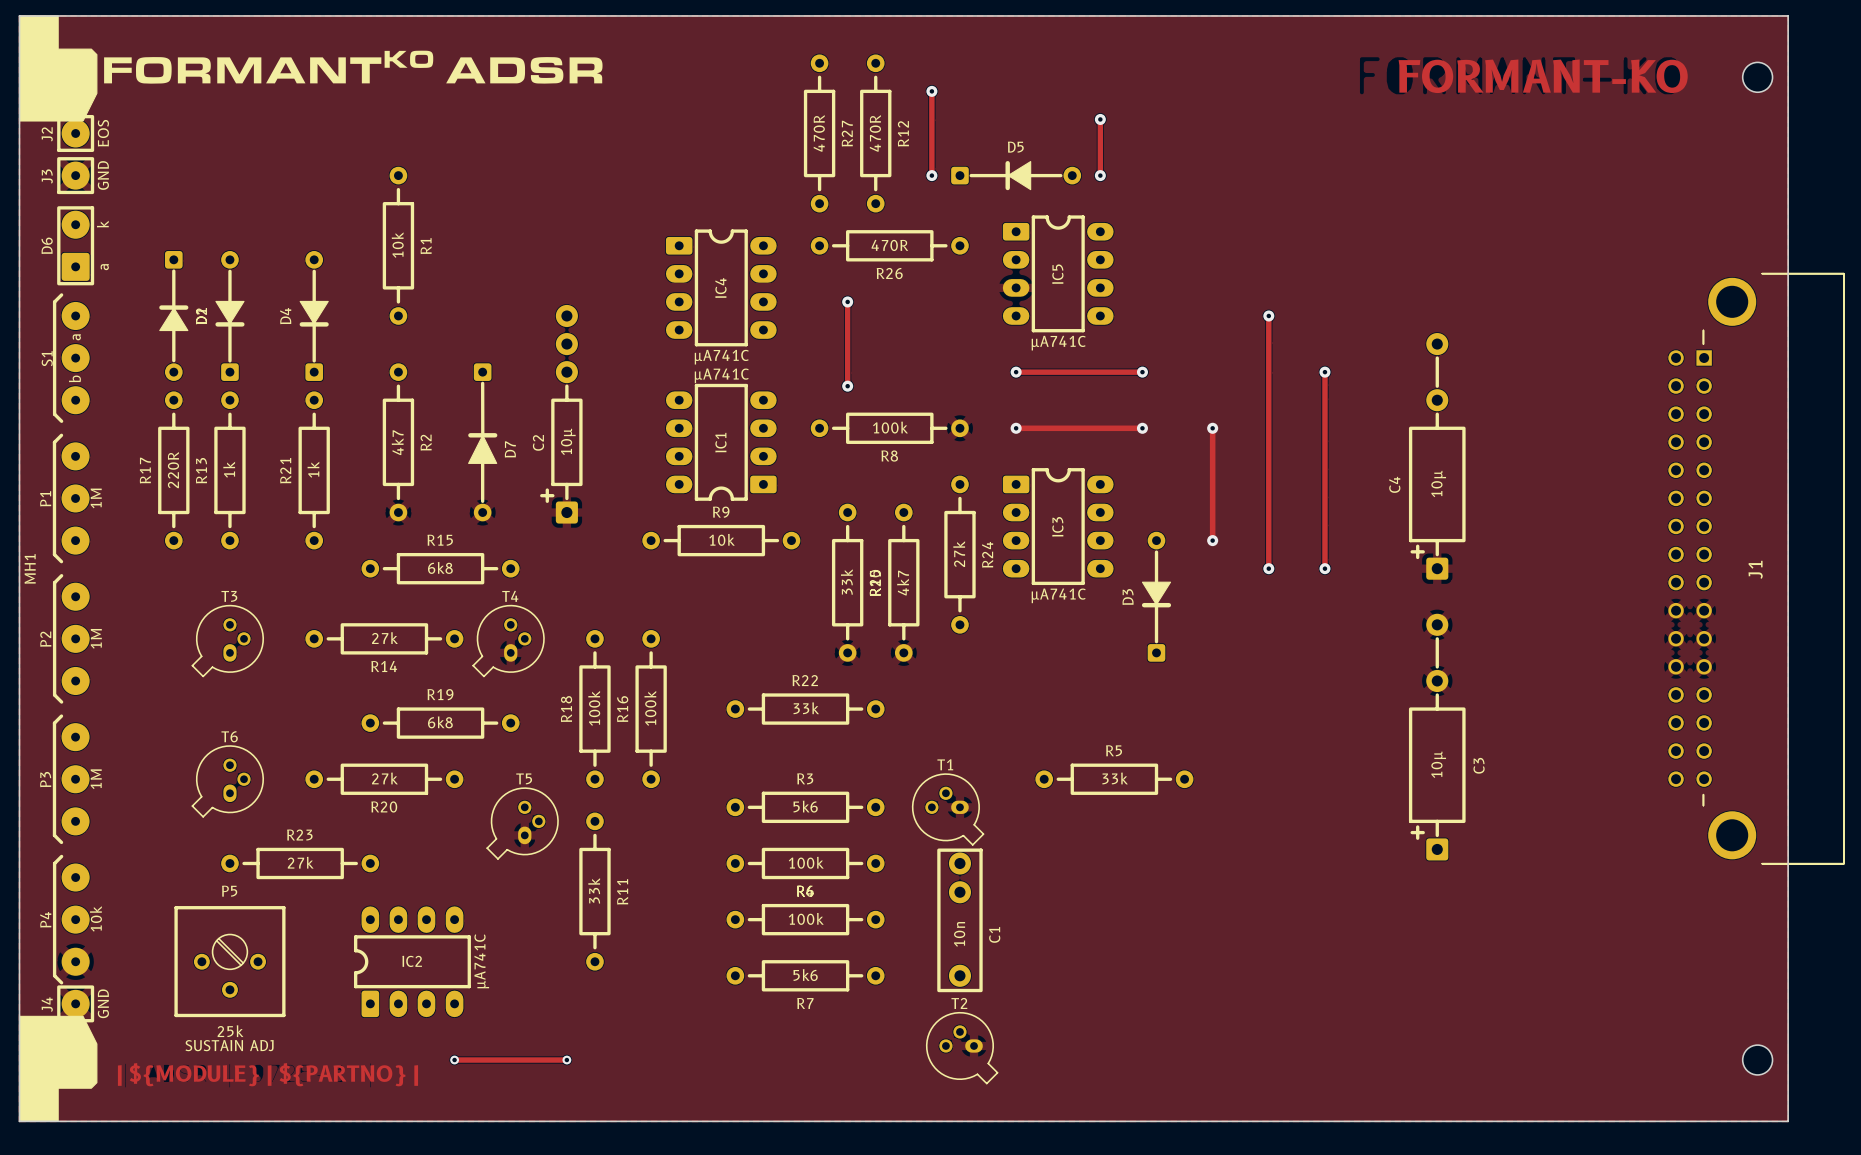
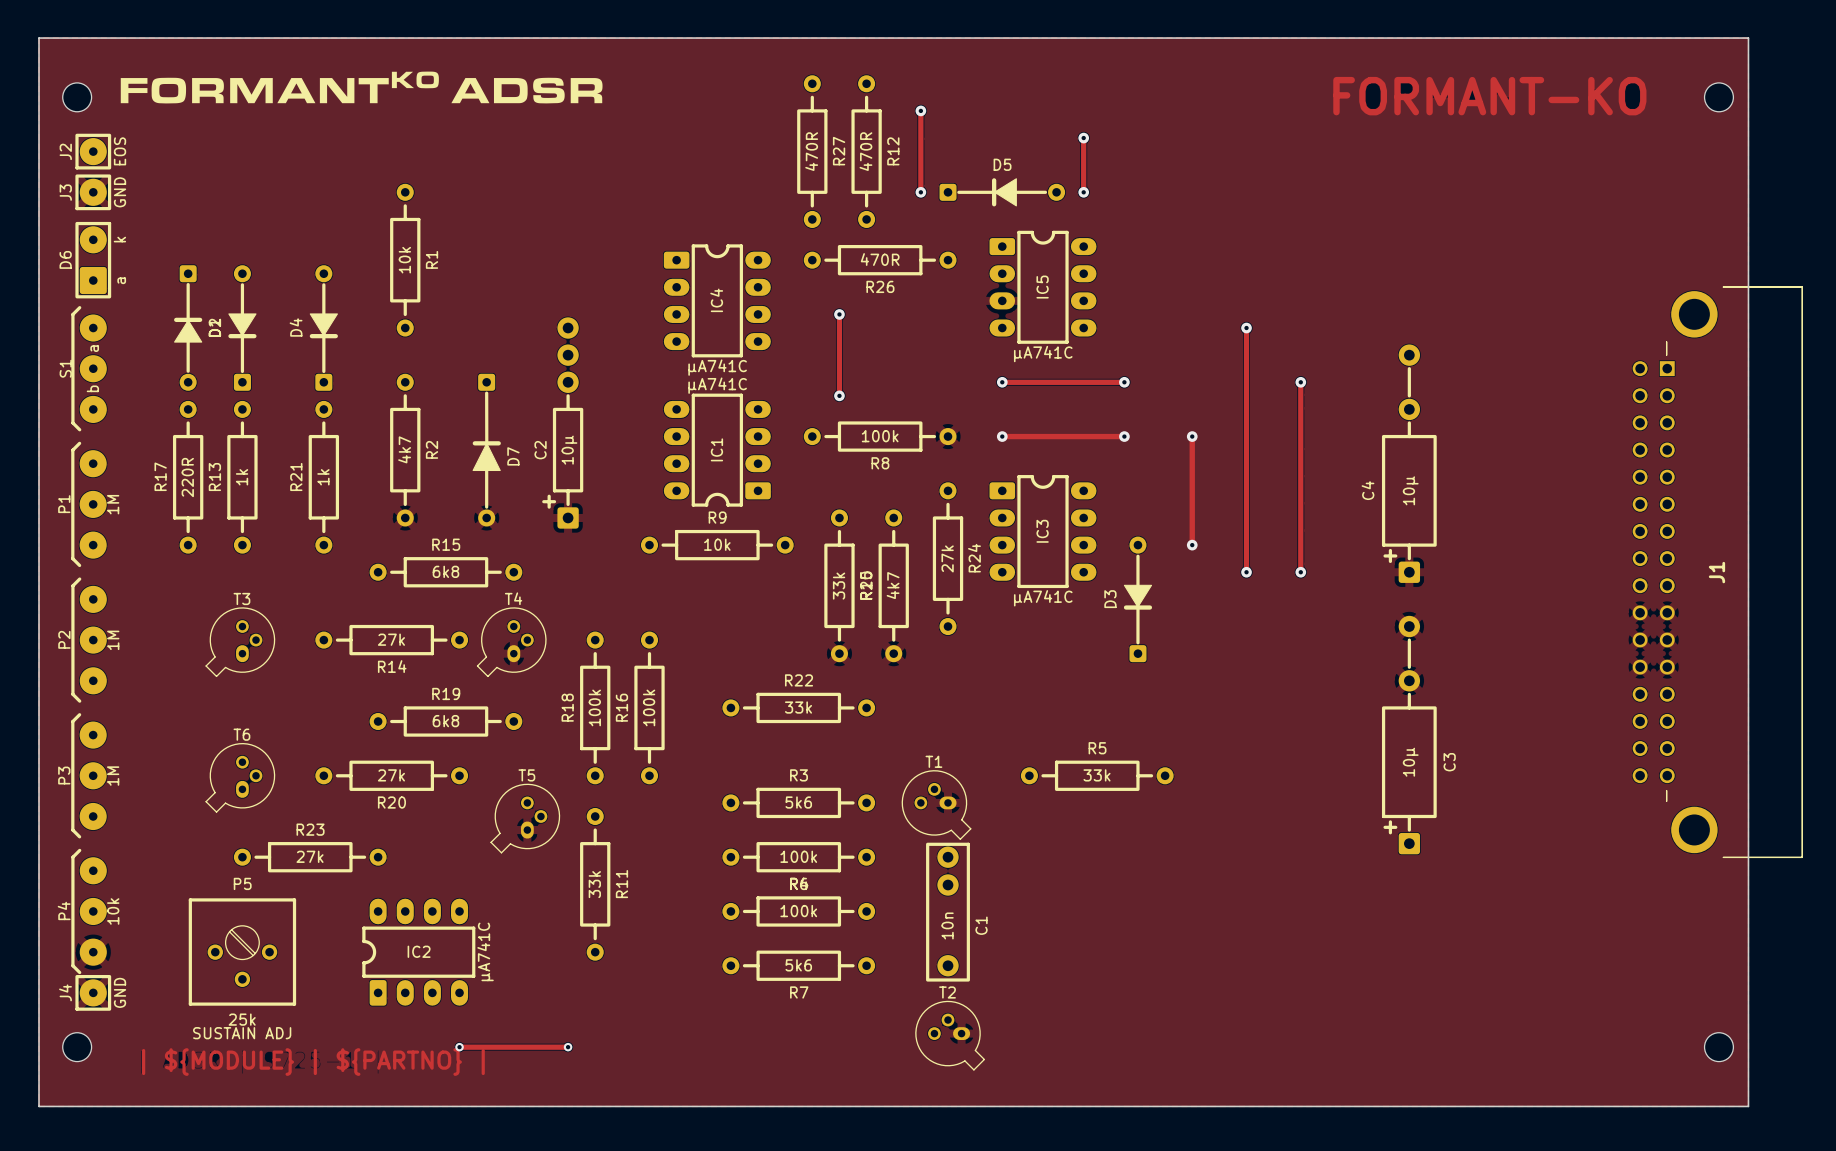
part: none -> (77, 97)
MH1: (58, 568) -> none
part: none -> (77, 1047)

